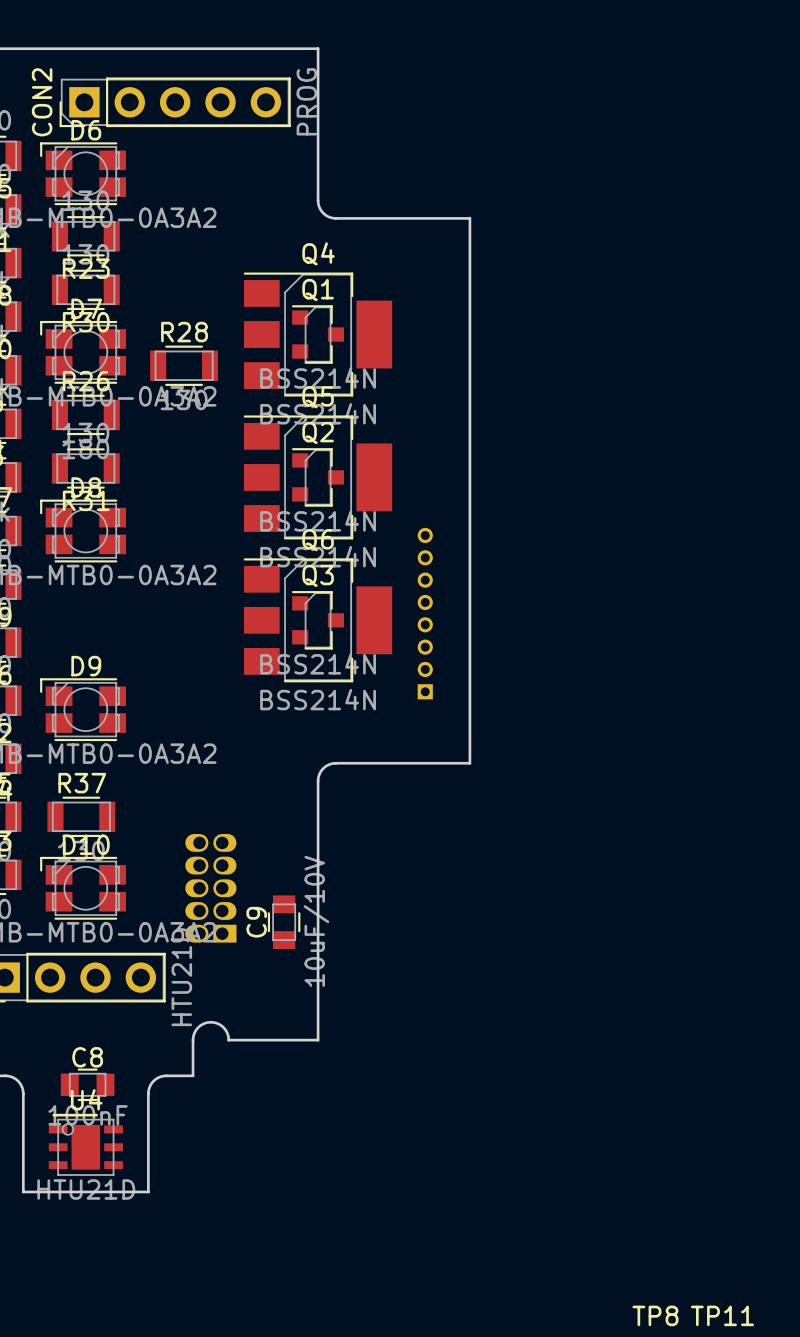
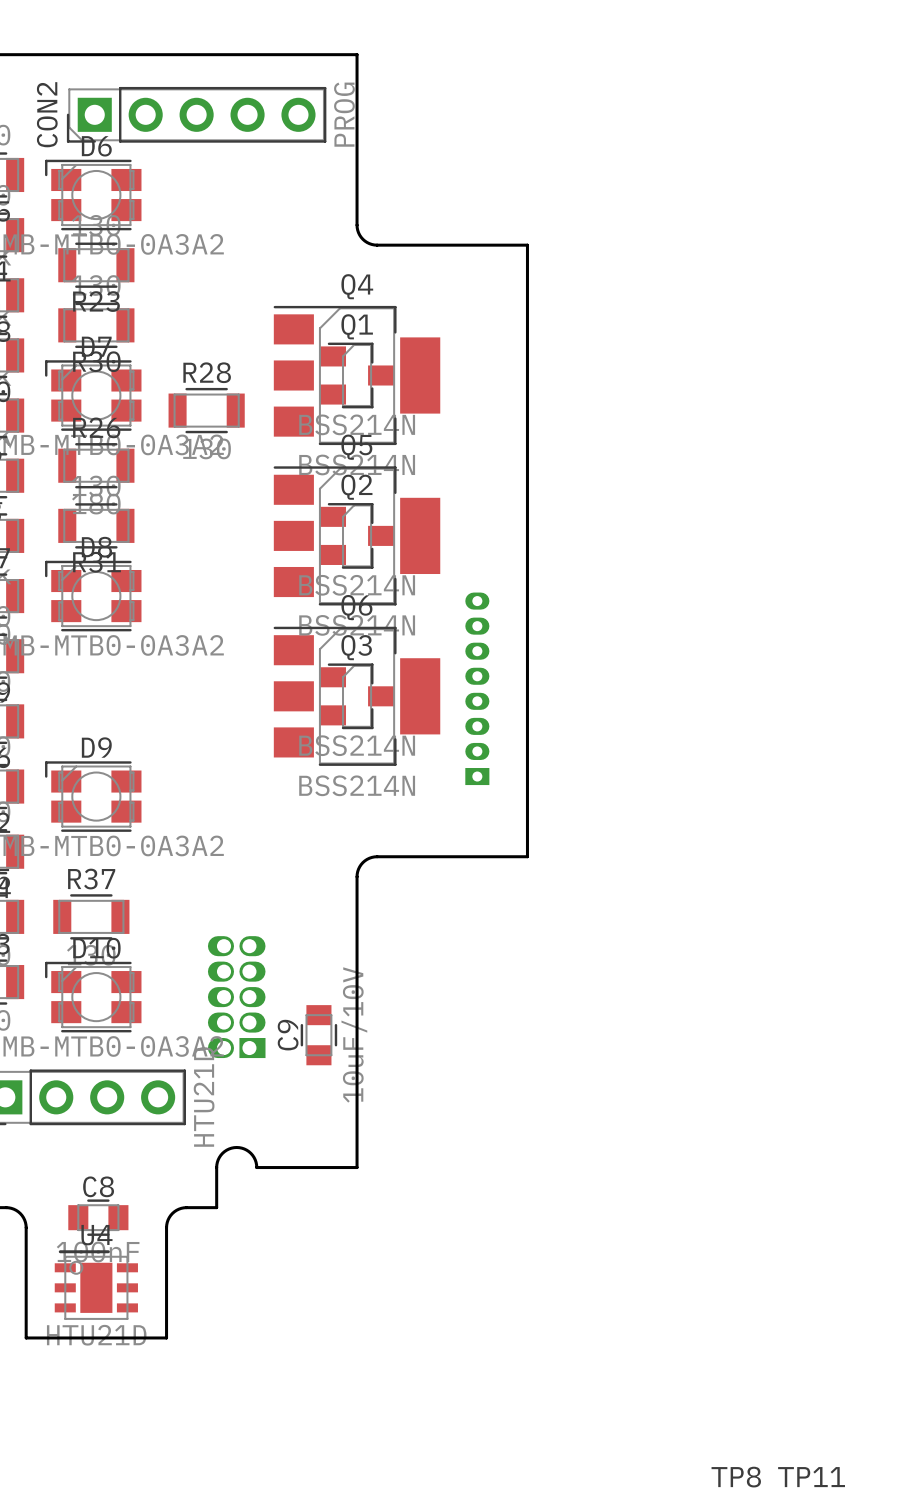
Q1 footprint: [291, 305, 344, 364] -> [319, 342, 395, 409]
Q2 footprint: [291, 448, 344, 507] -> [319, 503, 395, 569]
part footprint: [417, 527, 433, 700] -> [465, 592, 490, 786]
Q3 footprint: [291, 591, 344, 650] -> [319, 663, 395, 730]

